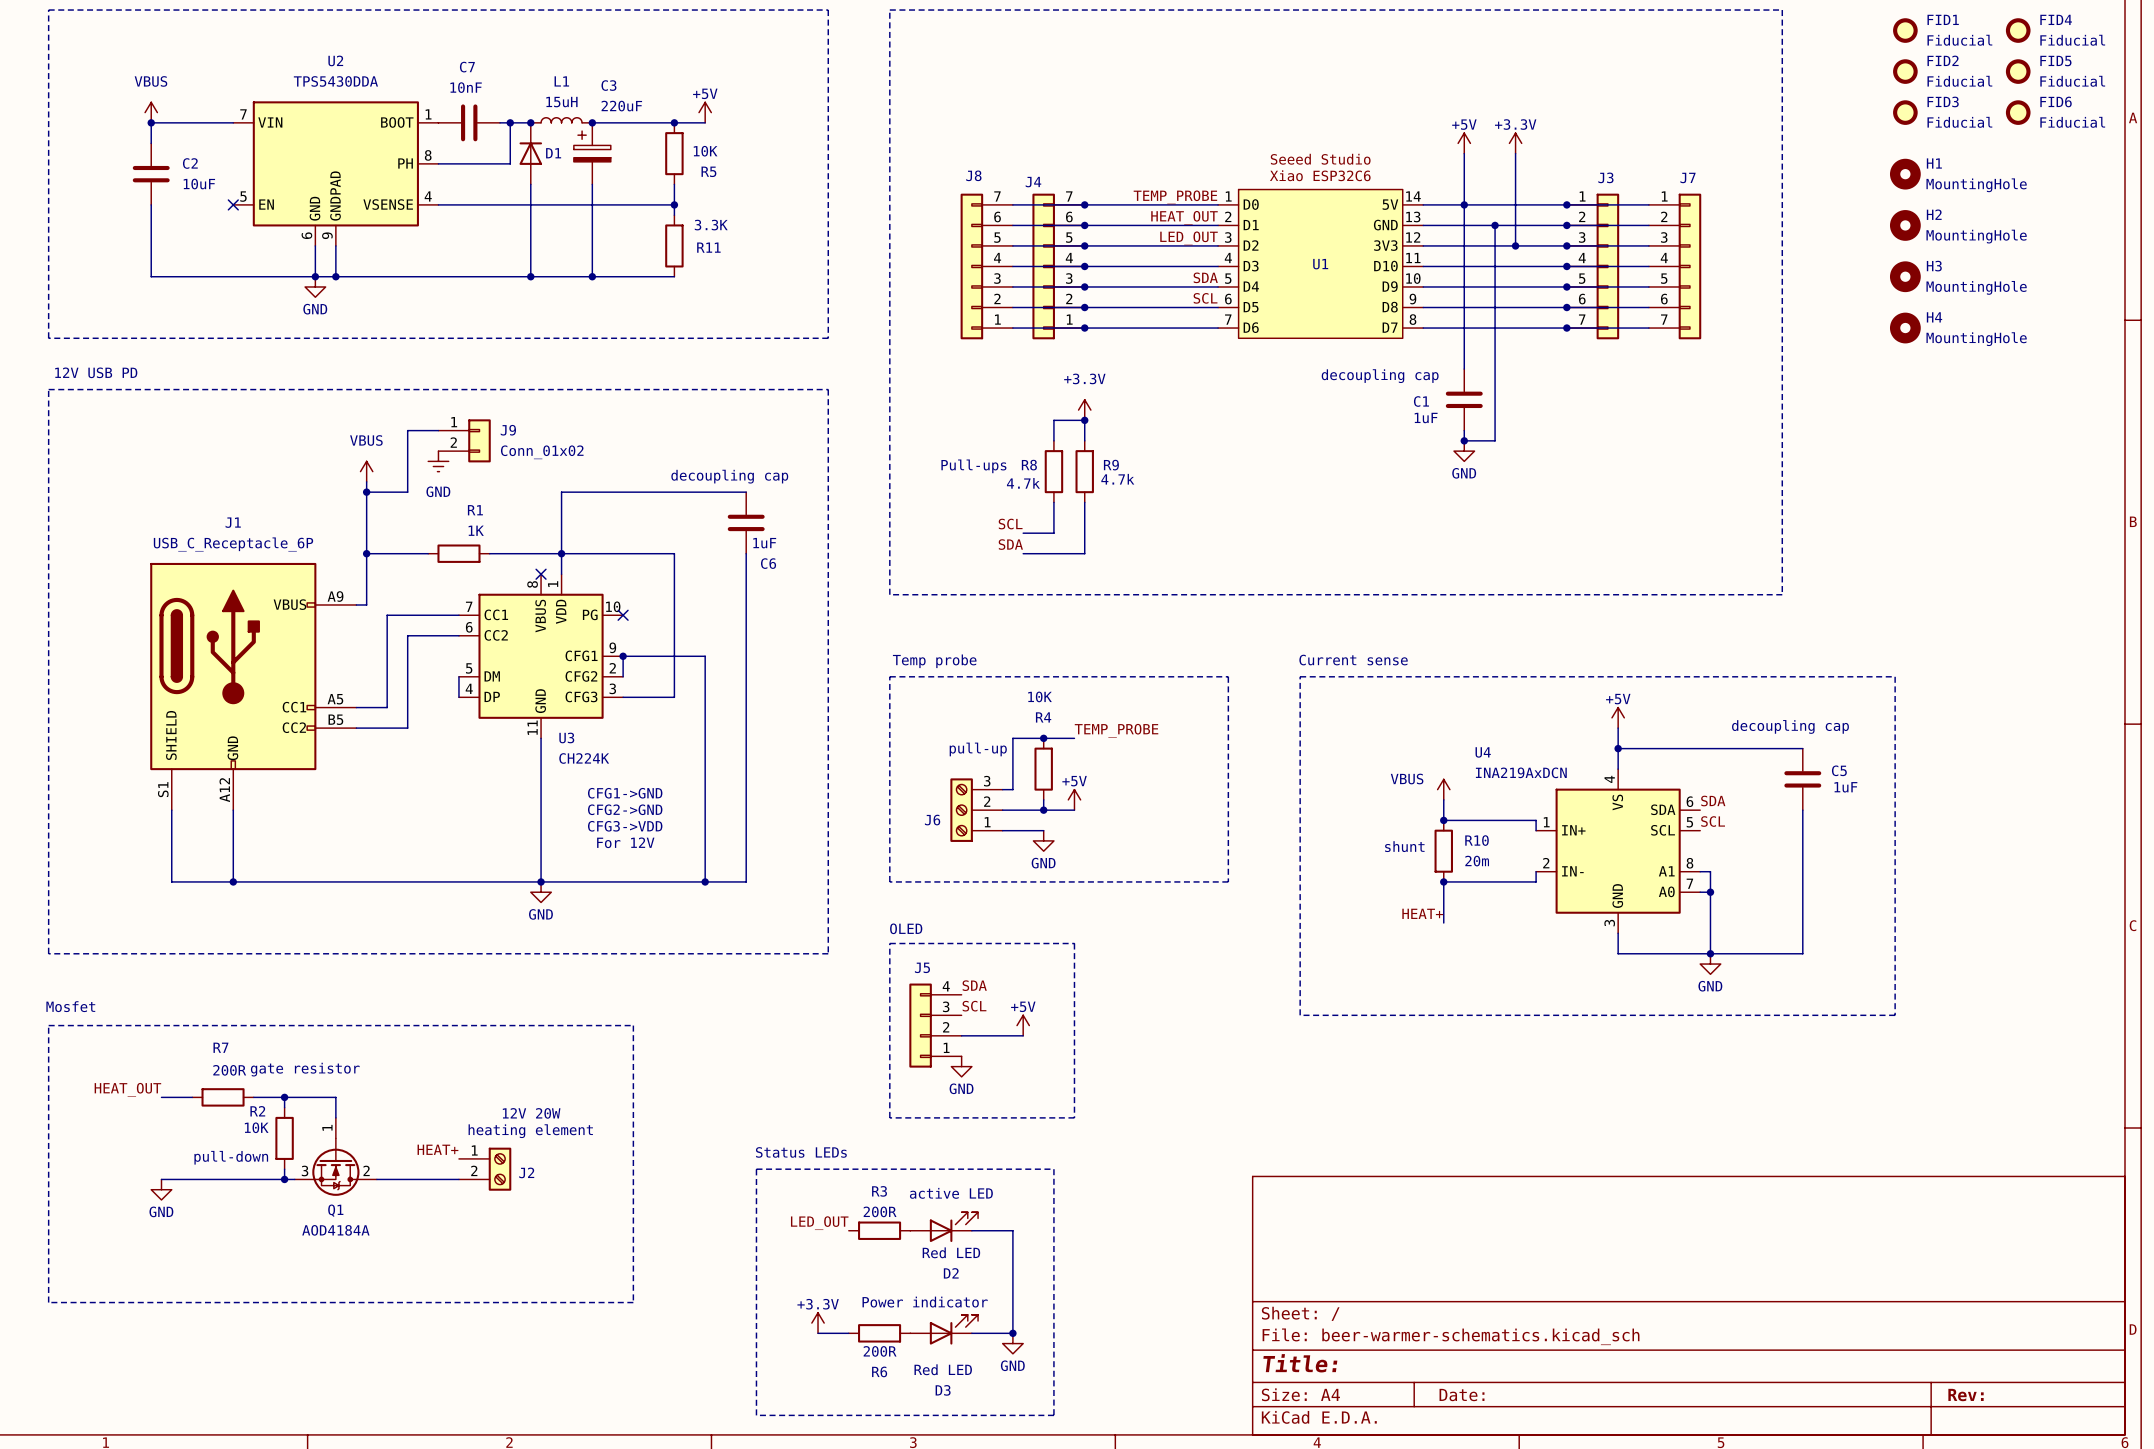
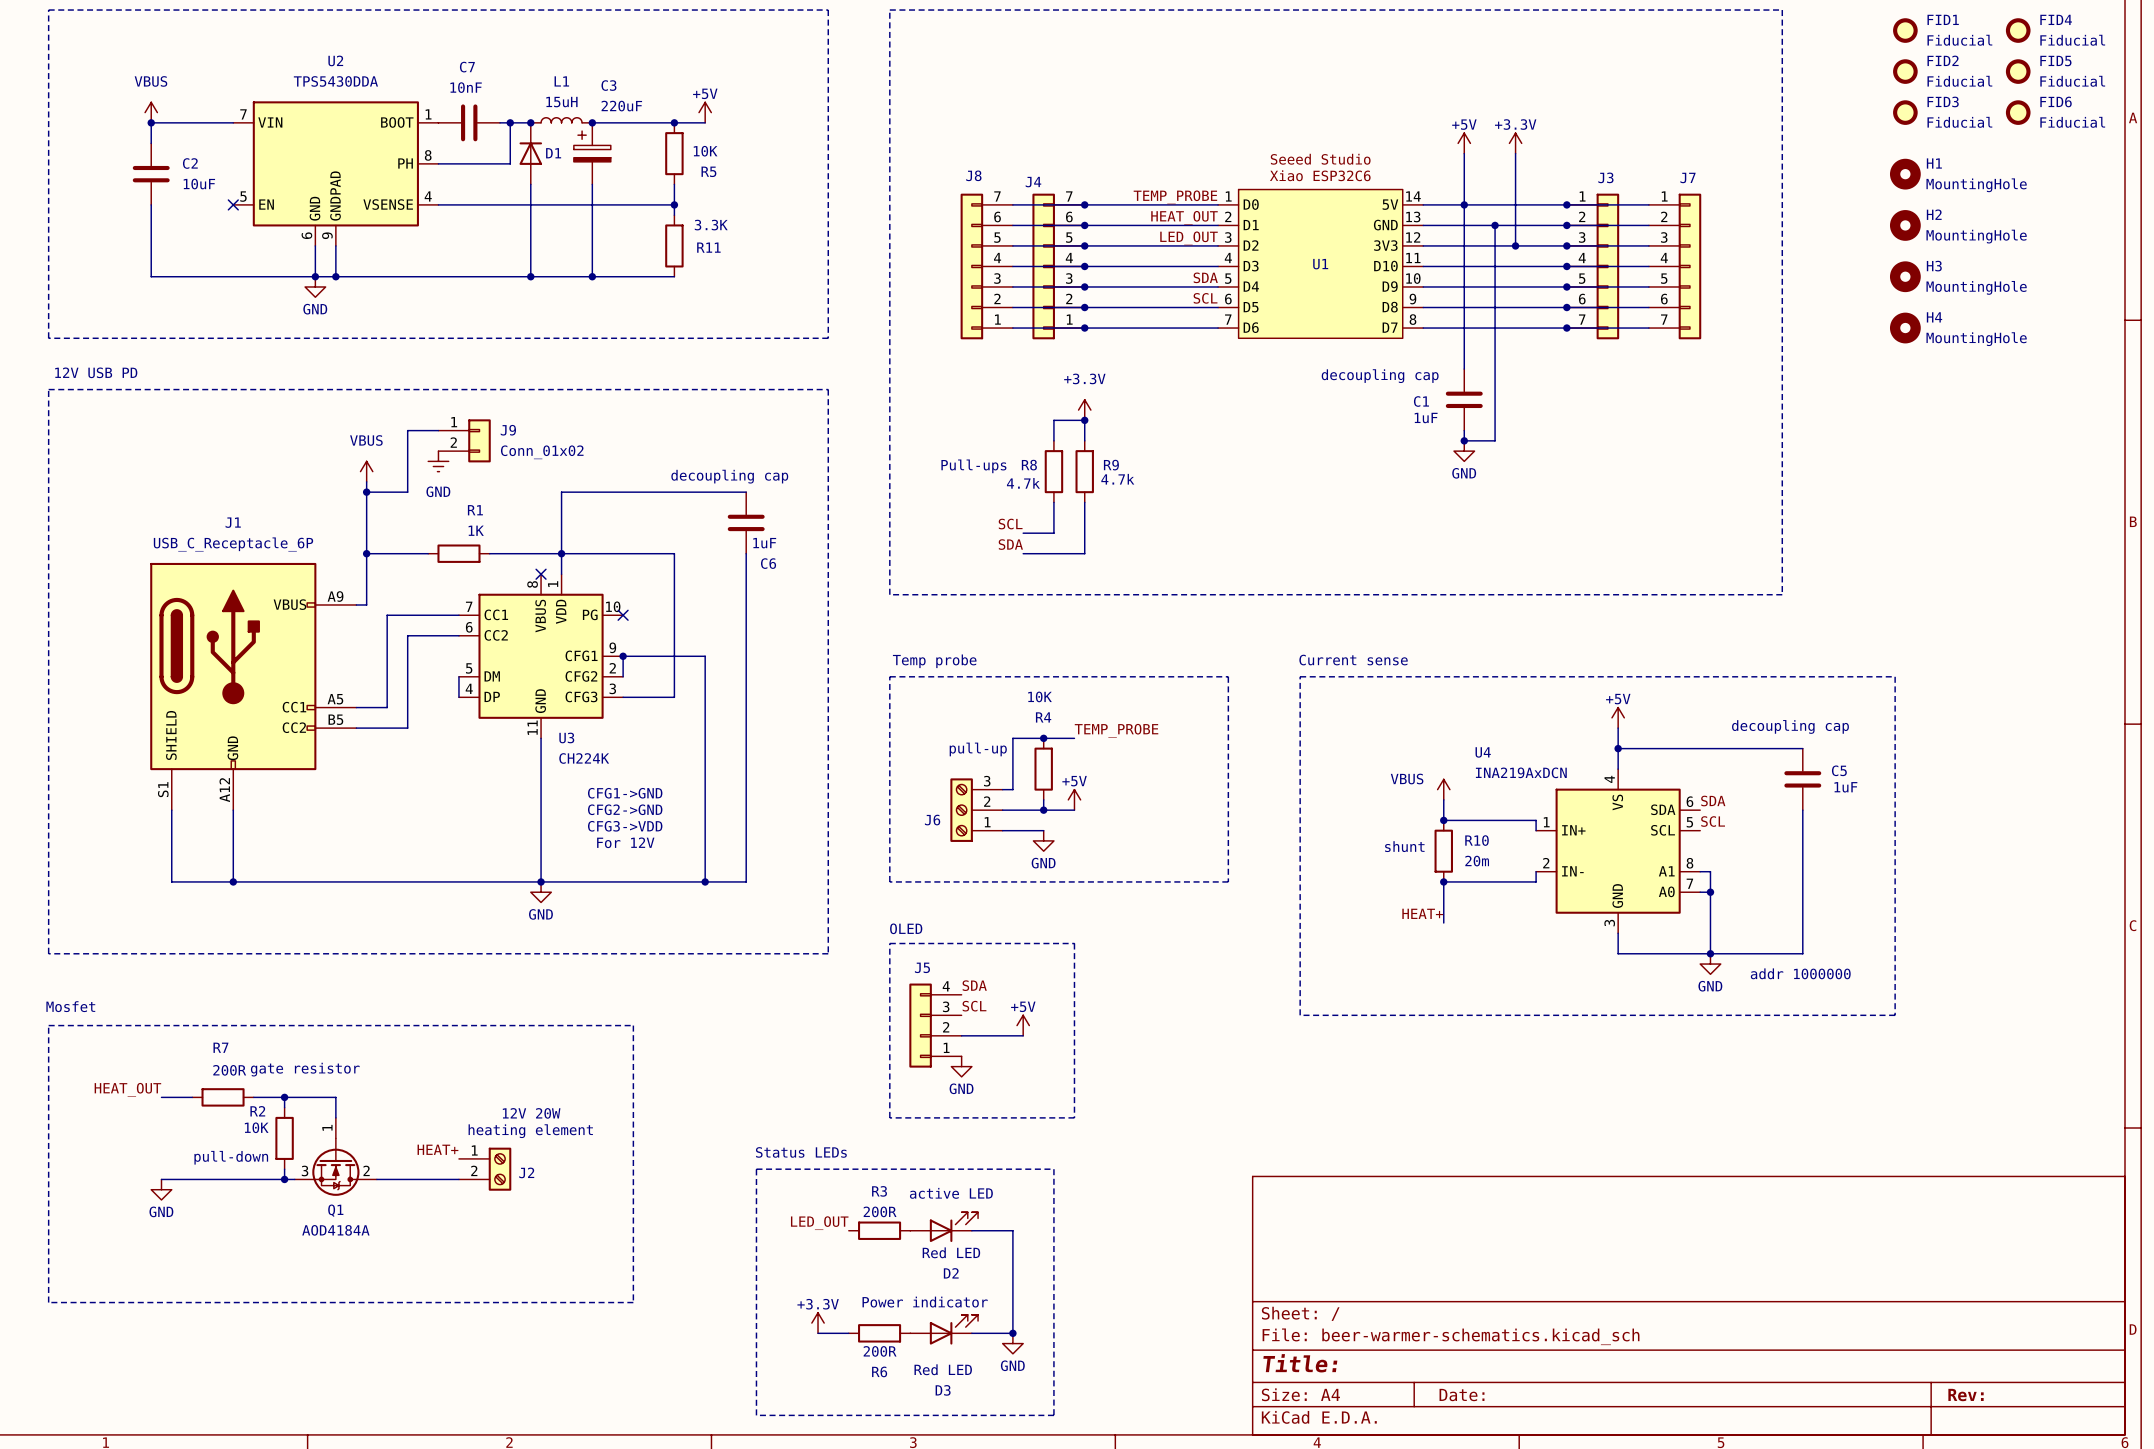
text: none -> addr 1000000 (1800, 973)

